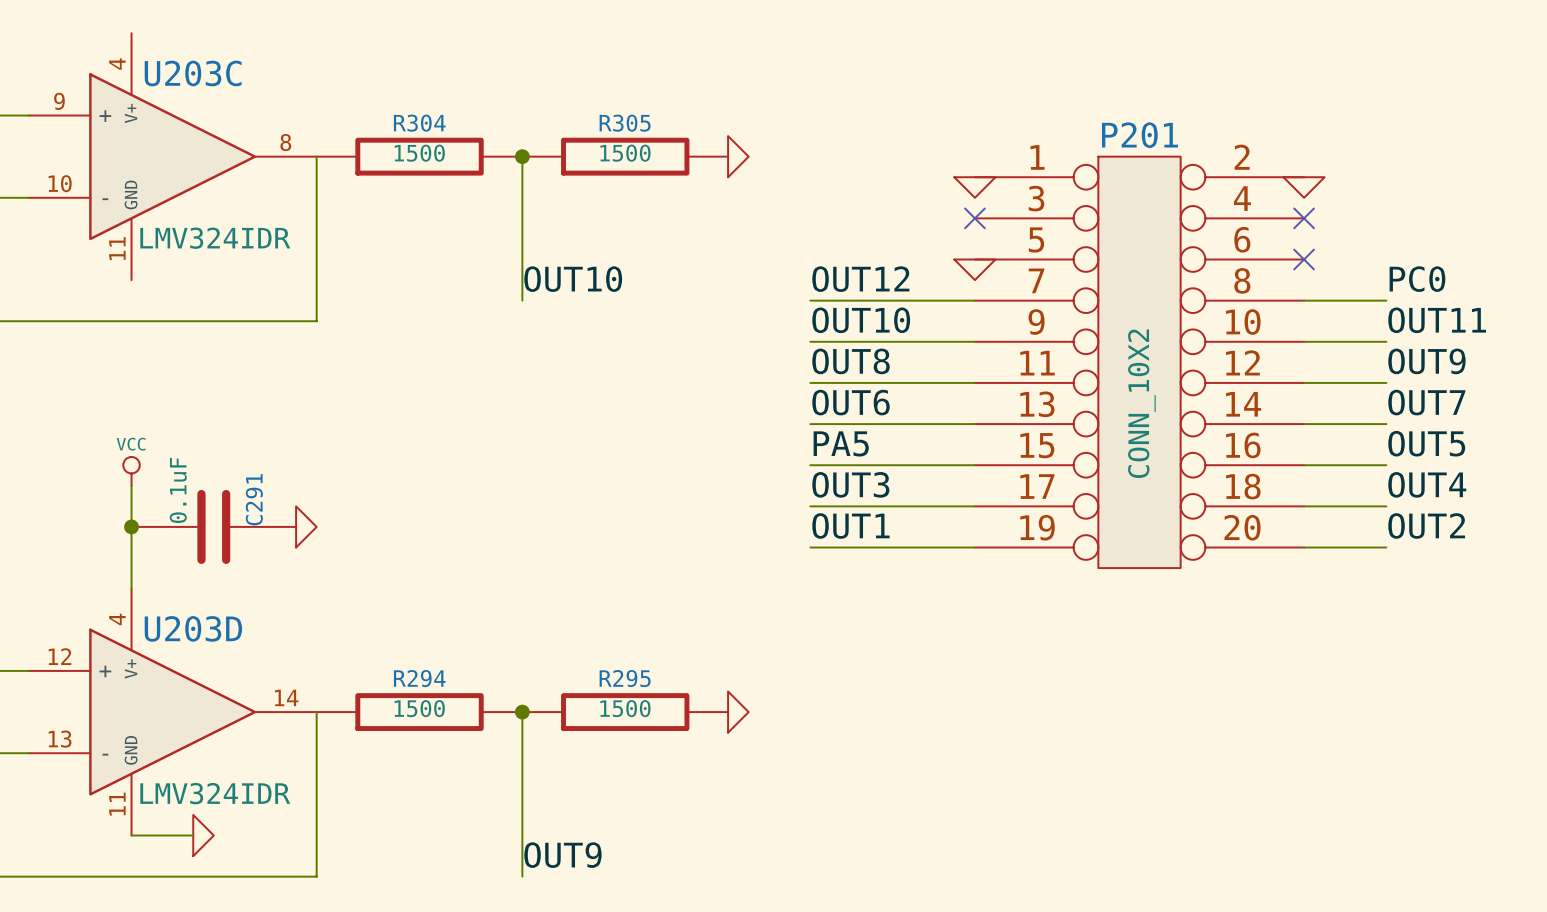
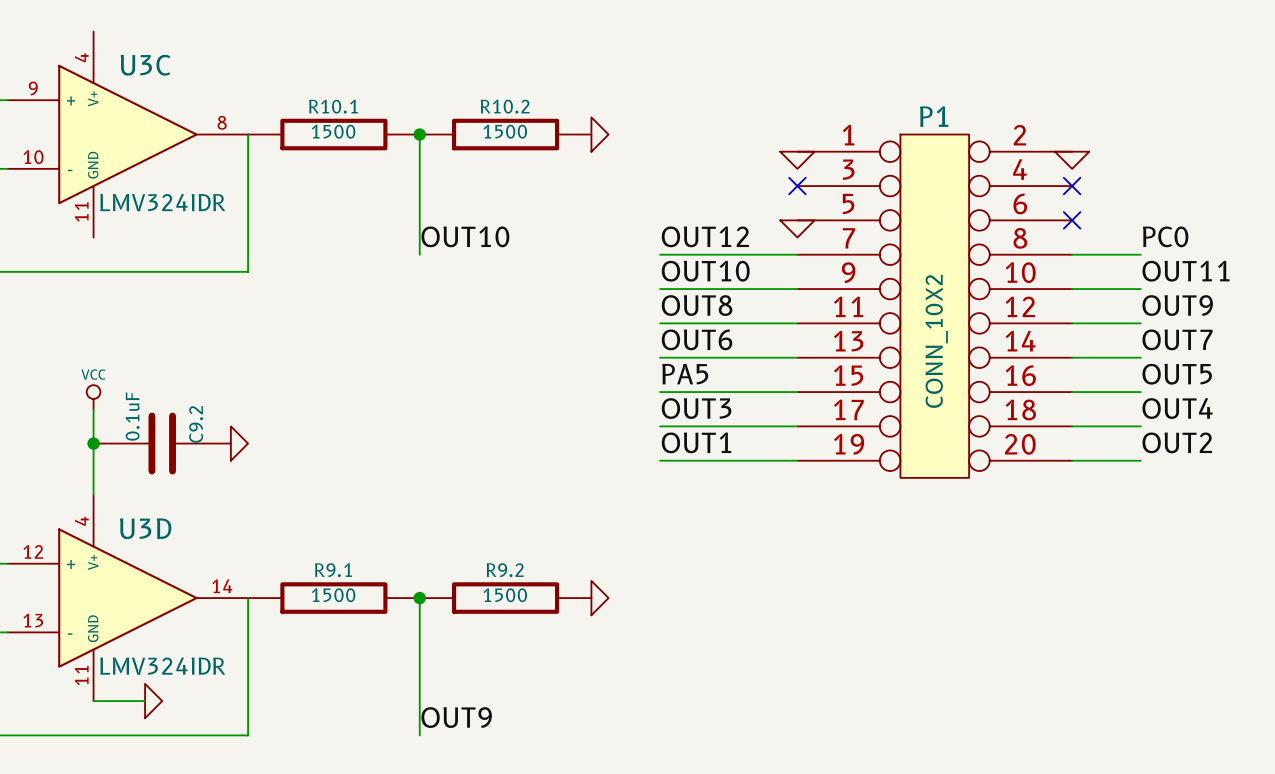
U203C name: U203C (193, 73) -> U3C (145, 65)
R304 name: R304 (419, 123) -> R10.1 (333, 106)
R305 name: R305 (625, 123) -> R10.2 (505, 106)
P201 name: P201 (1139, 135) -> P1 (934, 116)
C291 name: C291 (254, 499) -> C9.2 (196, 424)
U203D name: U203D (193, 628) -> U3D (145, 528)
R294 name: R294 (419, 678) -> R9.1 (333, 570)
R295 name: R295 (625, 678) -> R9.2 (505, 570)

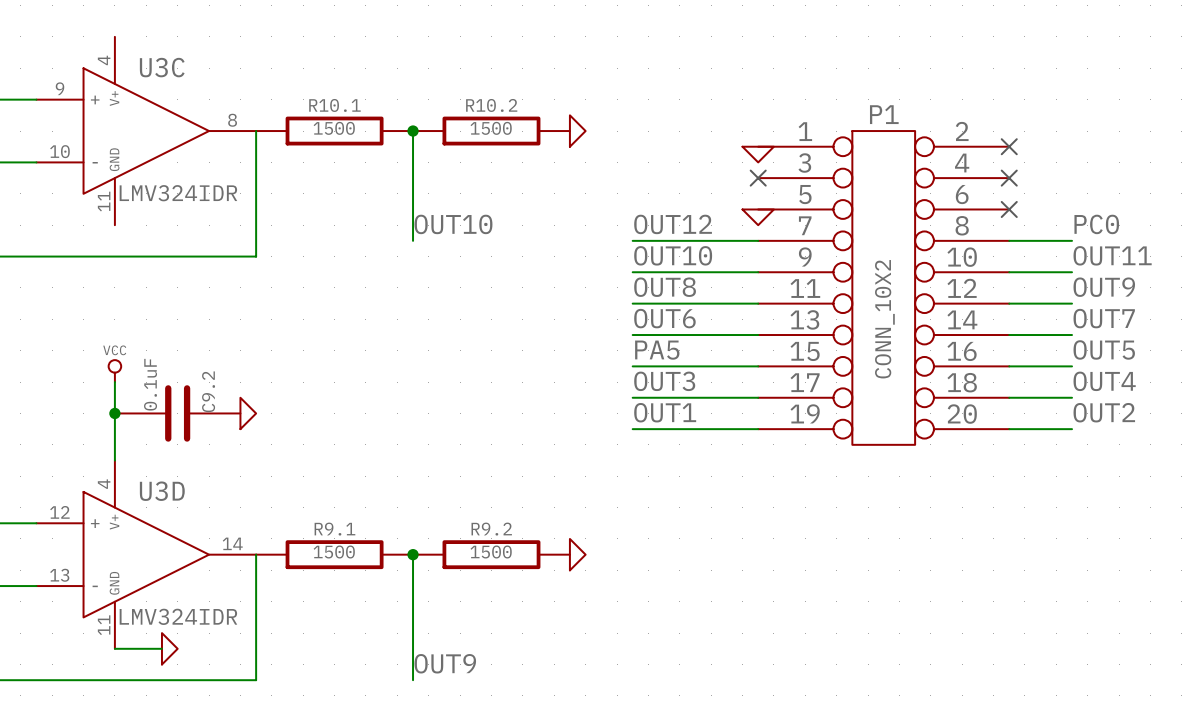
no-connect mark: none -> (1009, 146)
power symbol: (1072, 160) -> none

